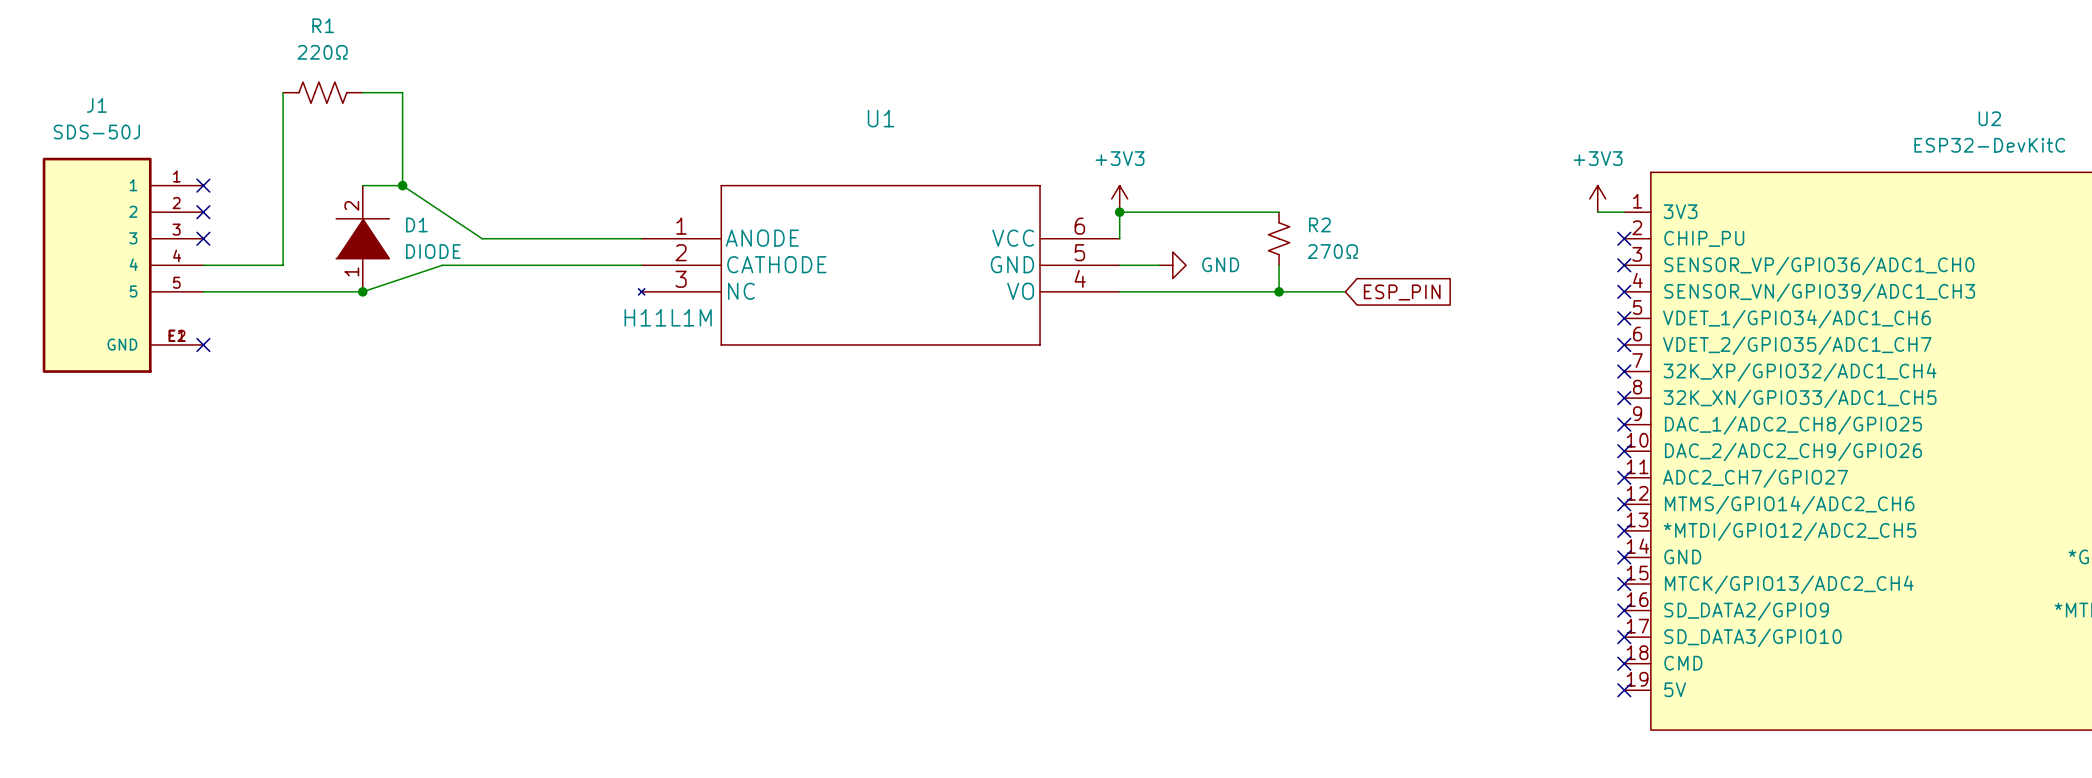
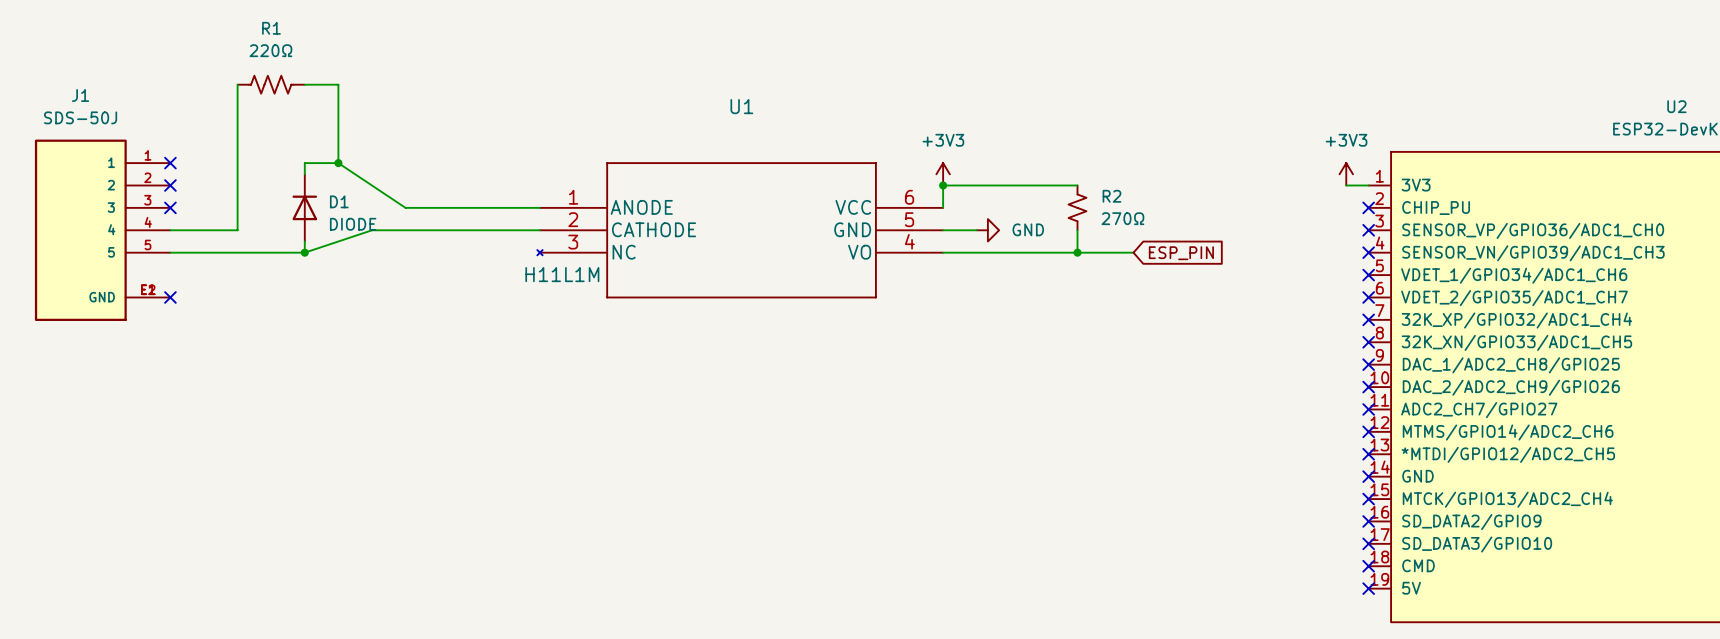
D1 symbol: [336, 185, 390, 292] -> [292, 174, 318, 242]

